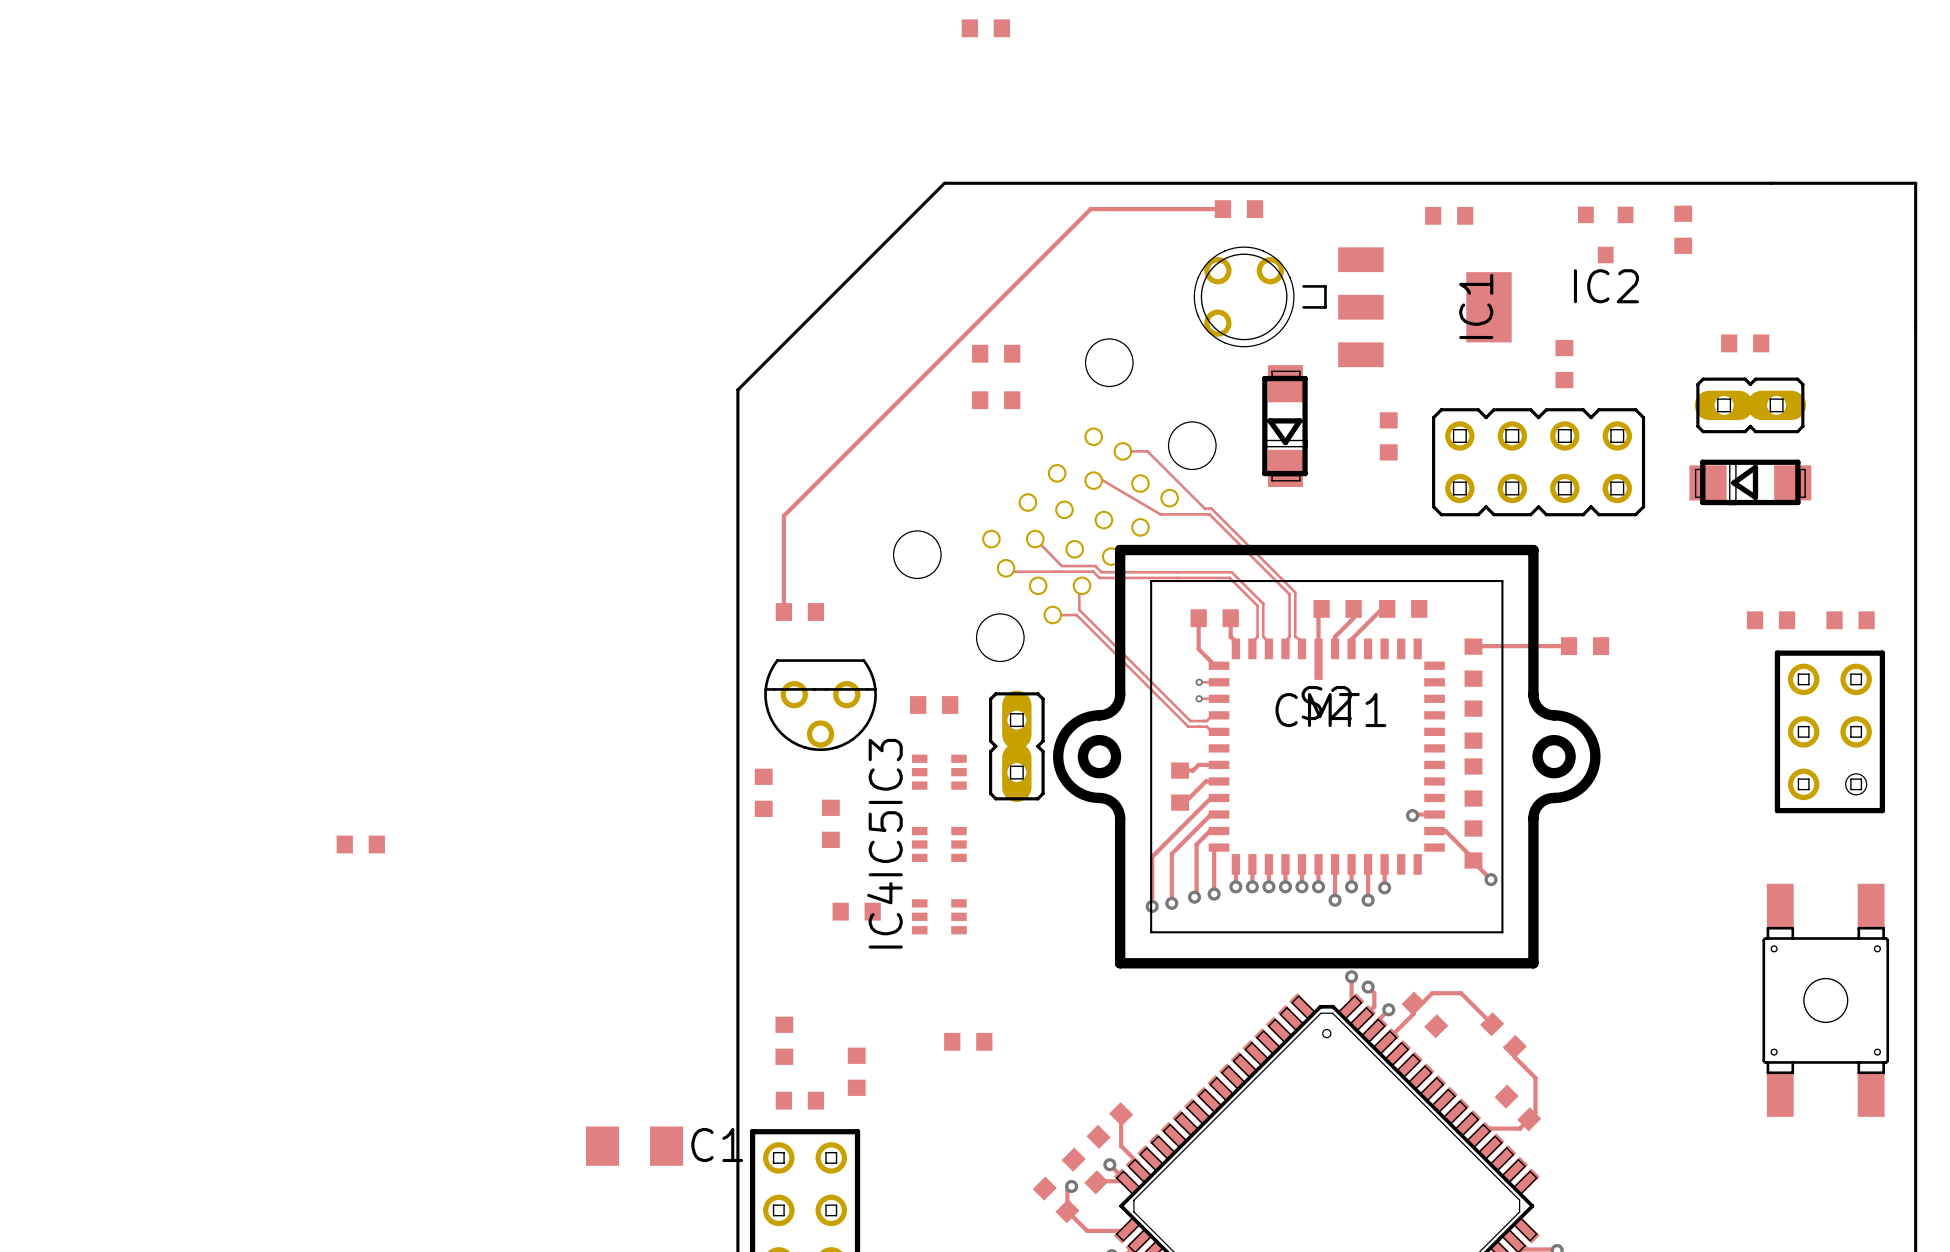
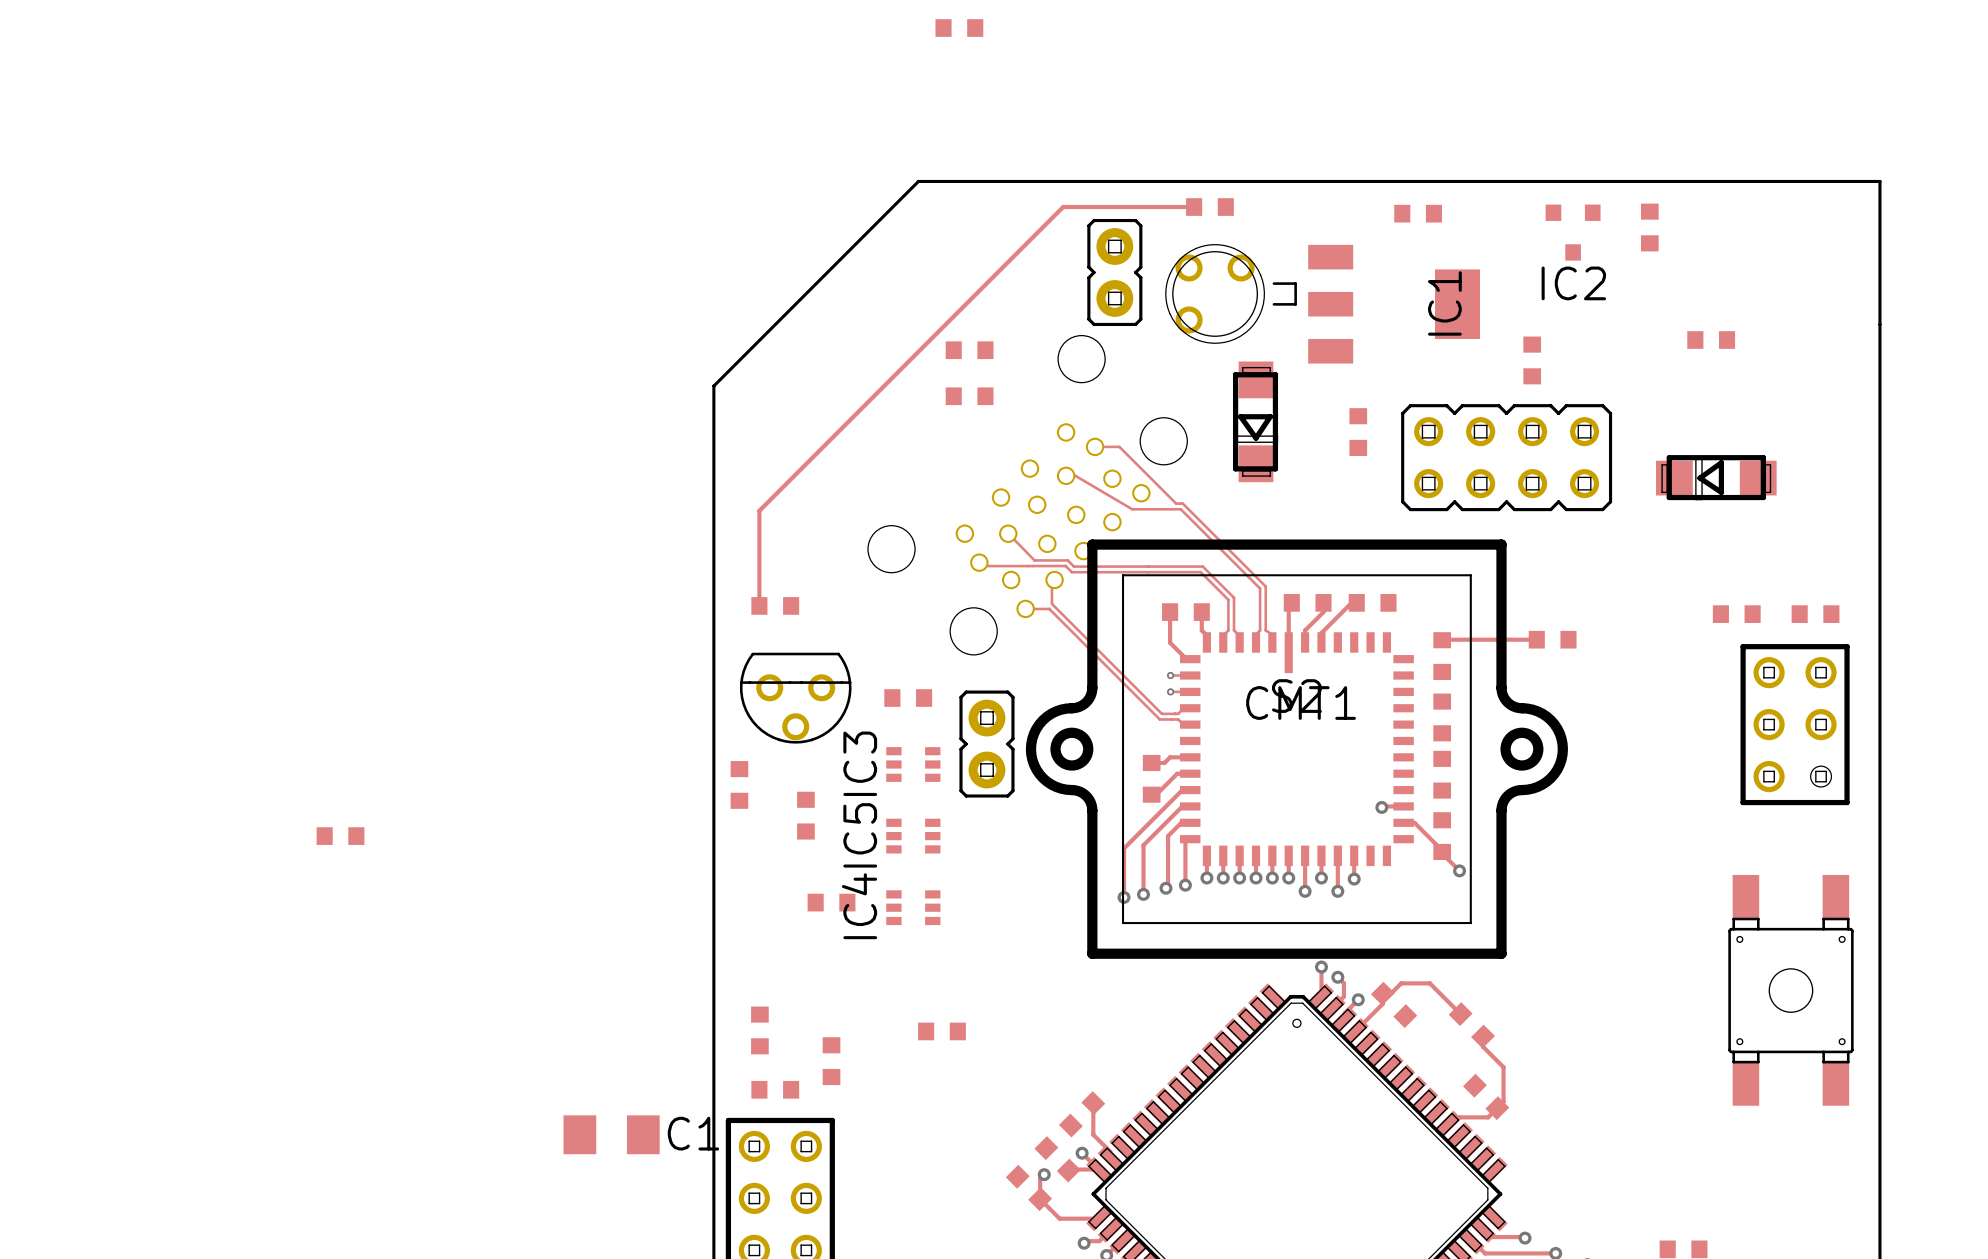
part: none -> (1114, 272)
part: (1750, 405) -> none
part footprint: [989, 690, 1045, 802] -> [959, 690, 1015, 798]

